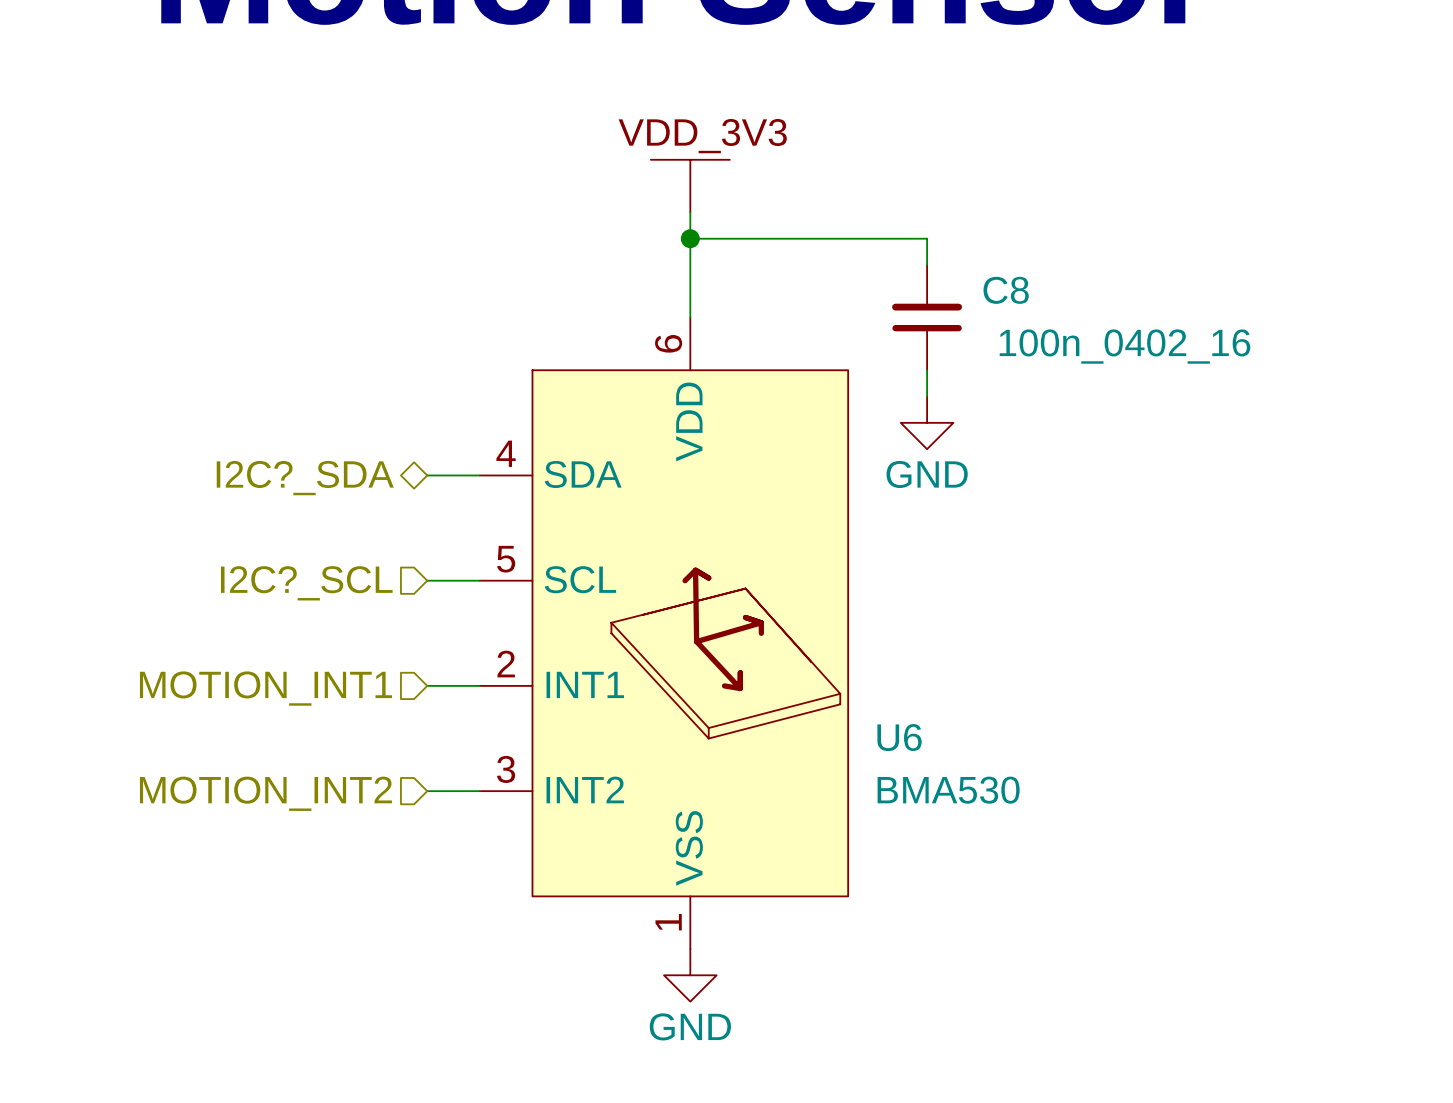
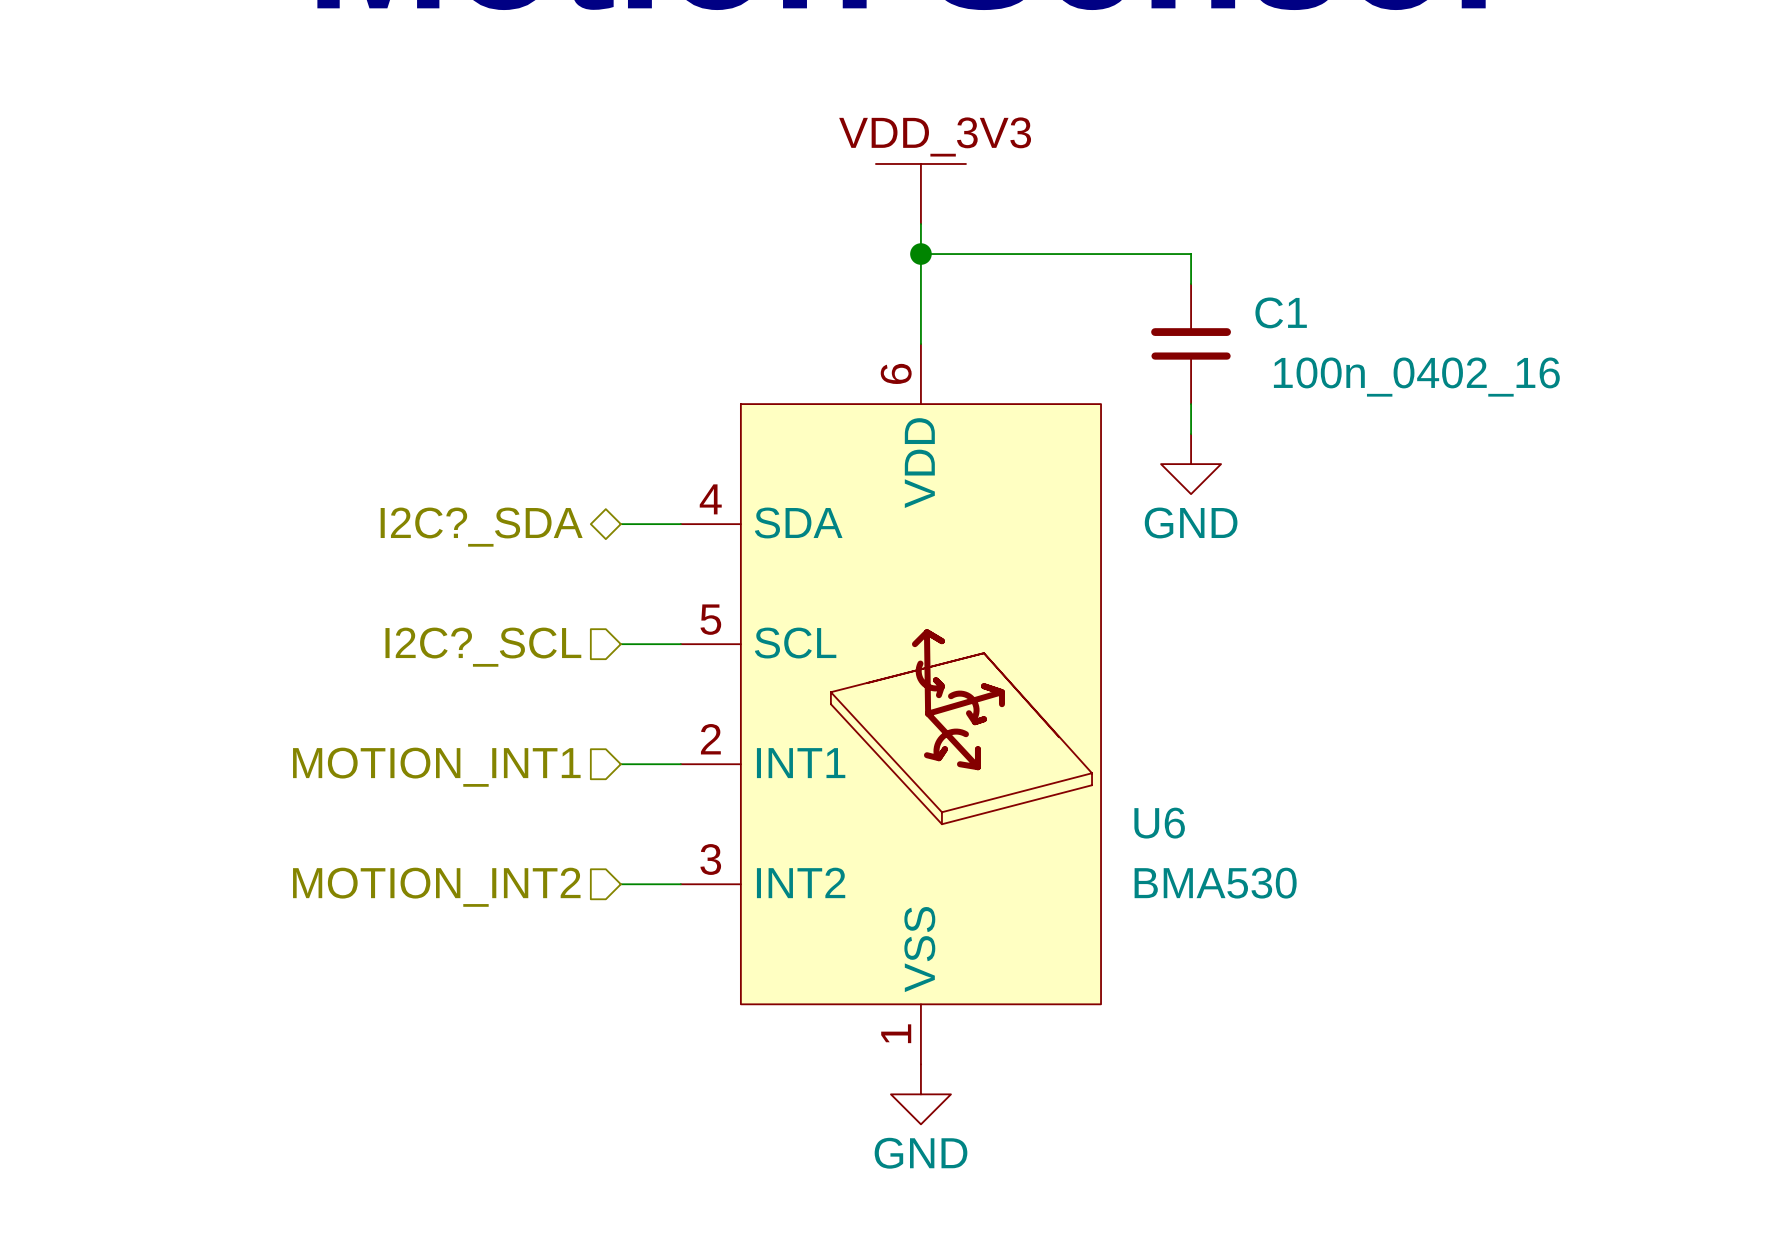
C8 name: C8 (1006, 290) -> C1 (1281, 312)
U6 symbol: [479, 317, 849, 949] -> [680, 344, 1102, 1065]

